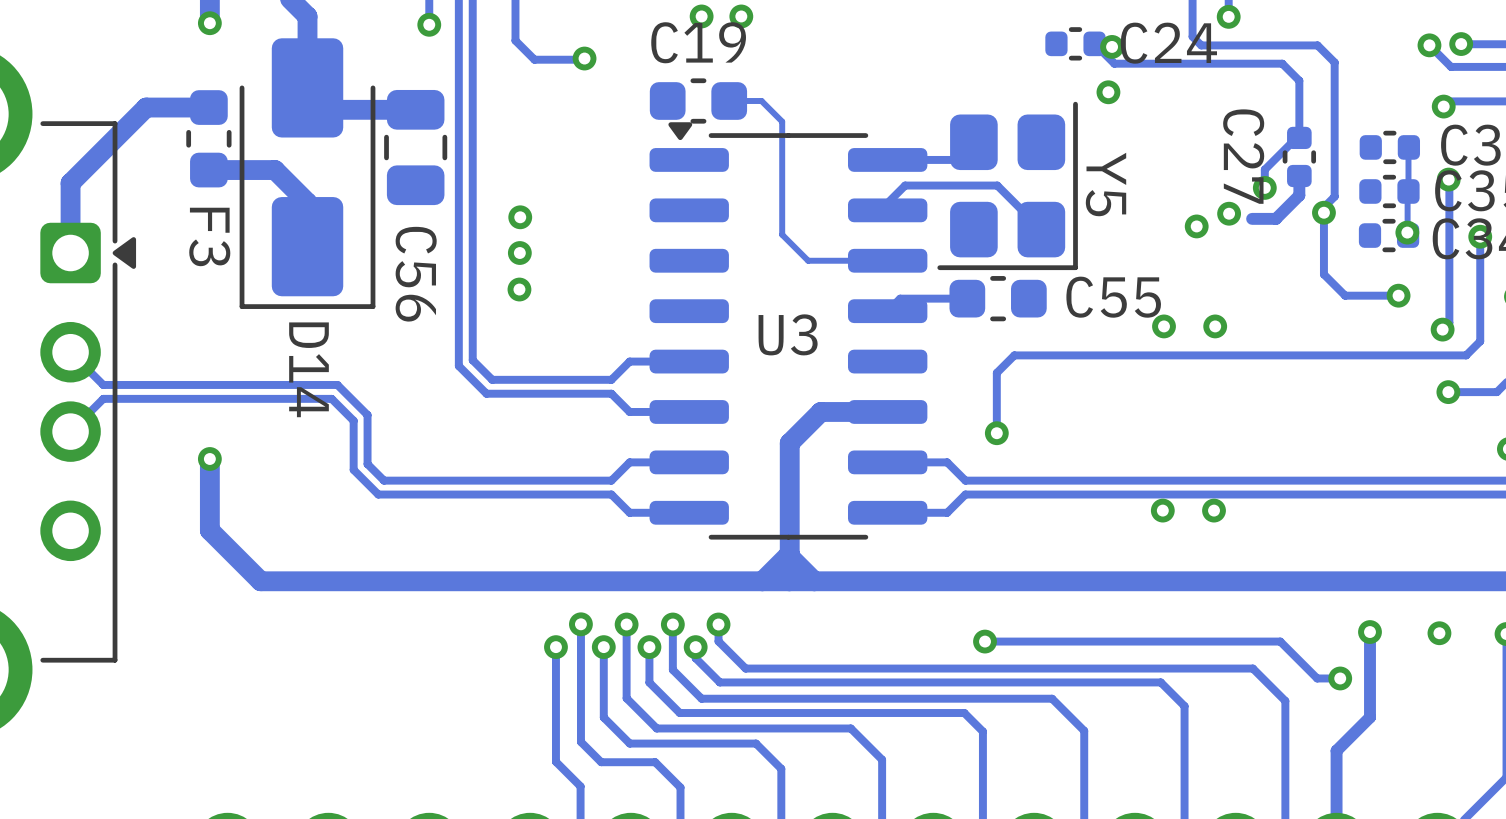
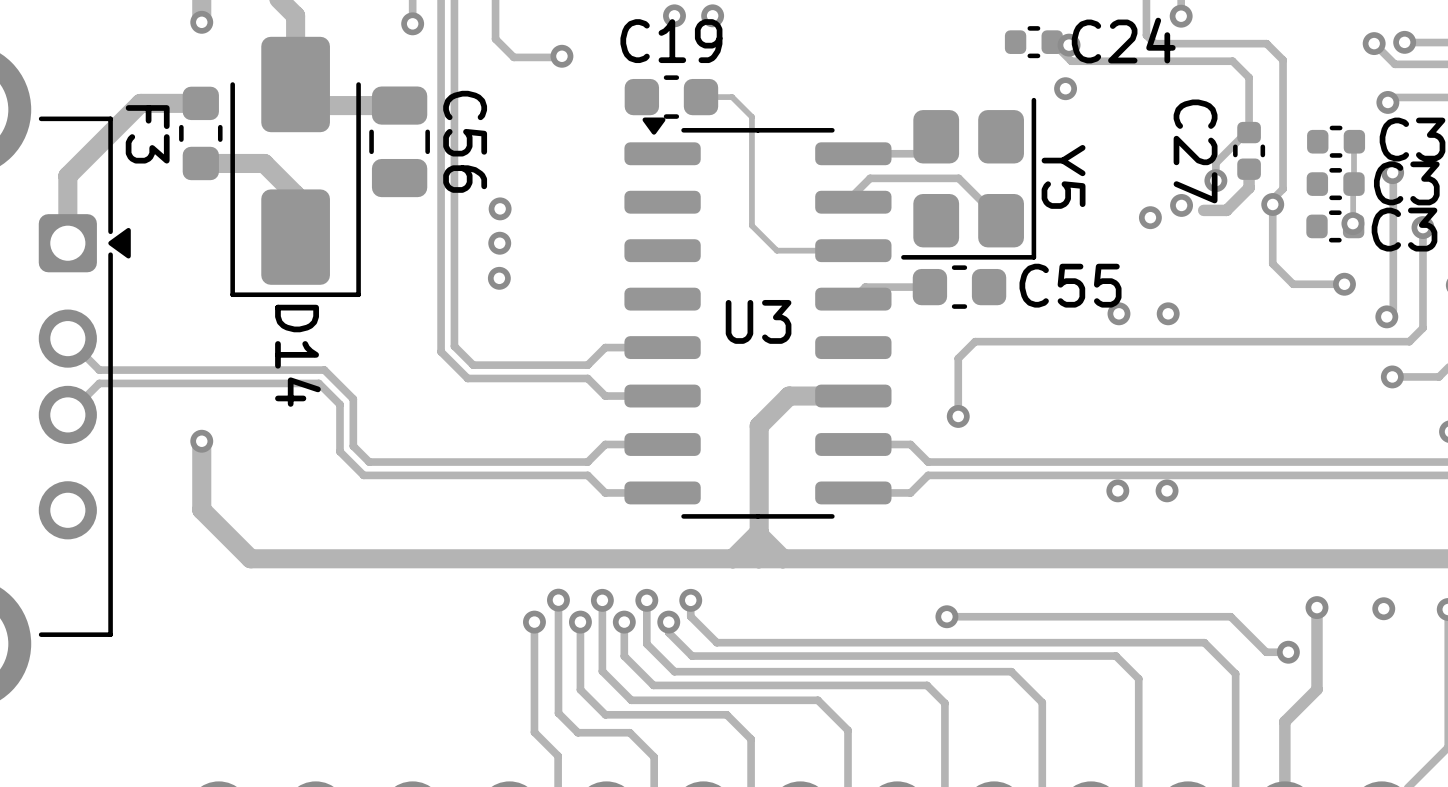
F3 name position: F3 (209, 236) -> F3 (147, 134)
C56 name position: C56 (416, 274) -> C56 (465, 141)

